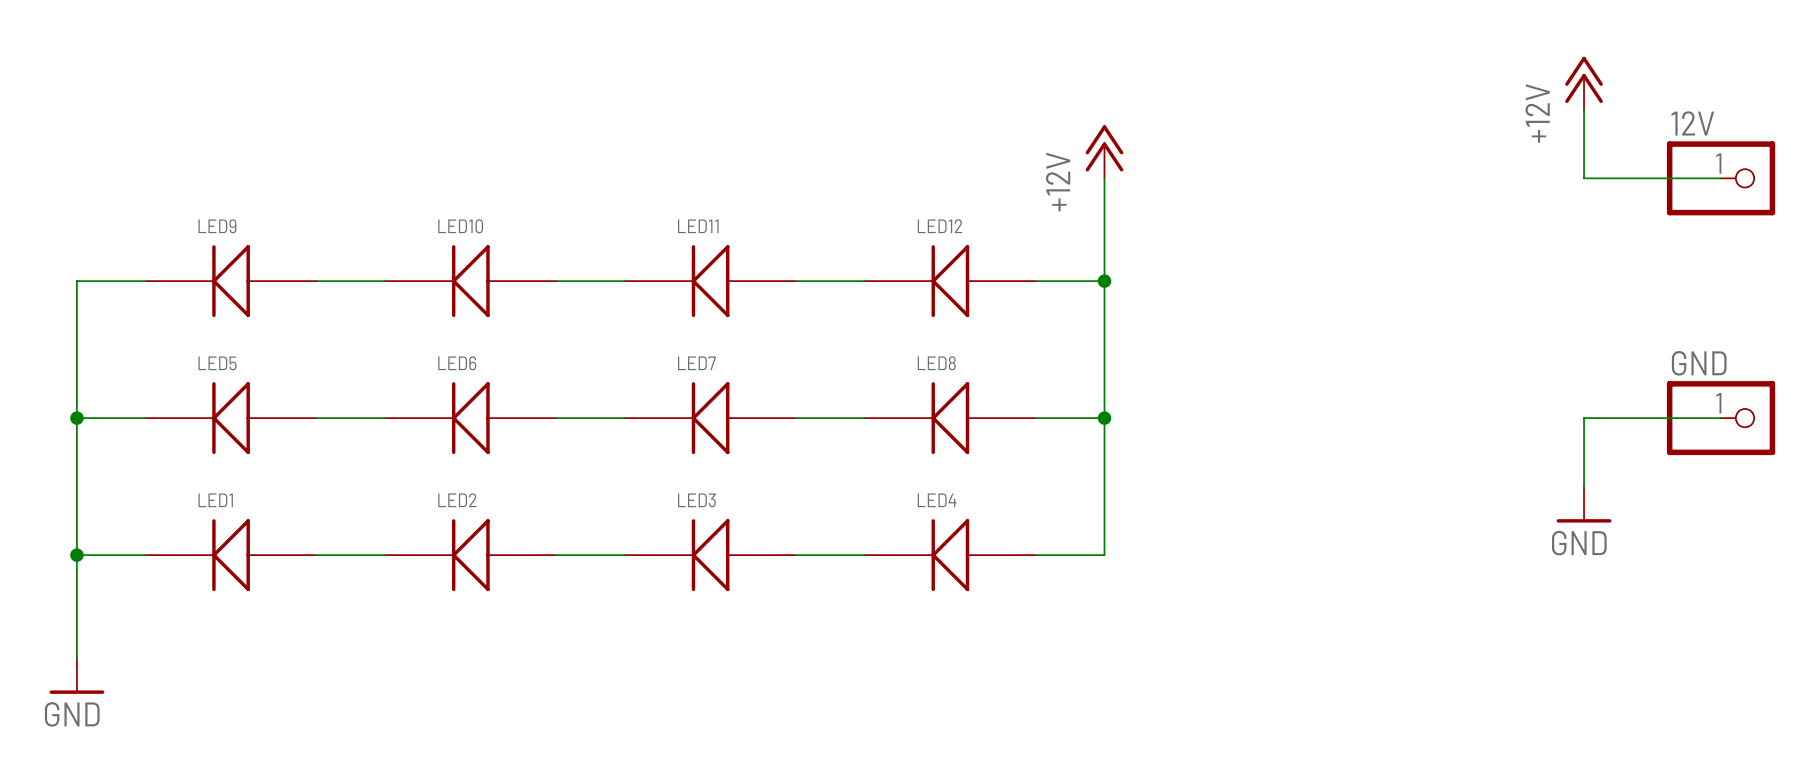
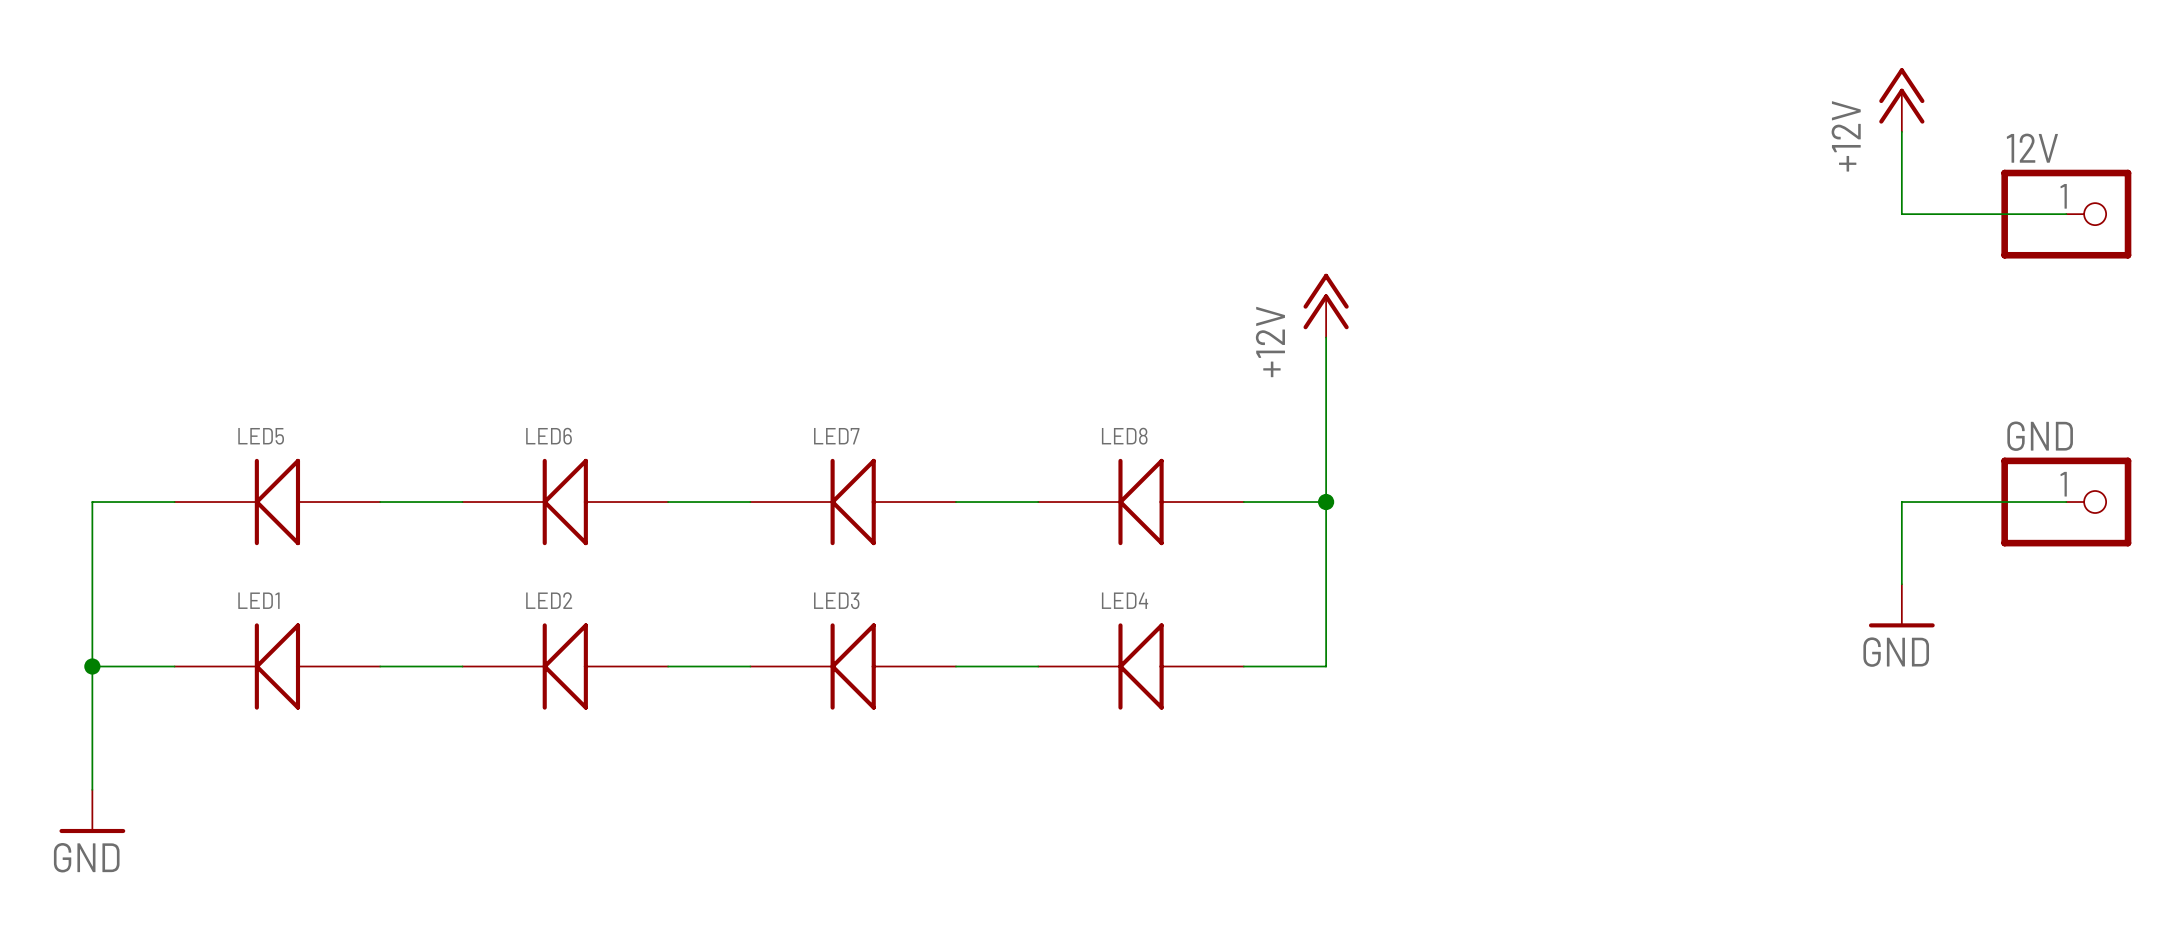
power symbol position: +12V (1104, 151) -> +12V (1326, 305)
wire: (1104, 178) (1104, 281) (1035, 281) -> none
wire: (145, 281) (76, 281) (76, 418) -> none
LED9: (231, 281) -> none
wire: (316, 281) (385, 281) -> none
LED10: (470, 281) -> none
wire: (556, 281) (624, 281) -> none
LED11: (710, 281) -> none
wire: (796, 281) (864, 281) -> none
LED12: (950, 281) -> none
junction: (1104, 281) -> none
junction: (76, 418) -> none

